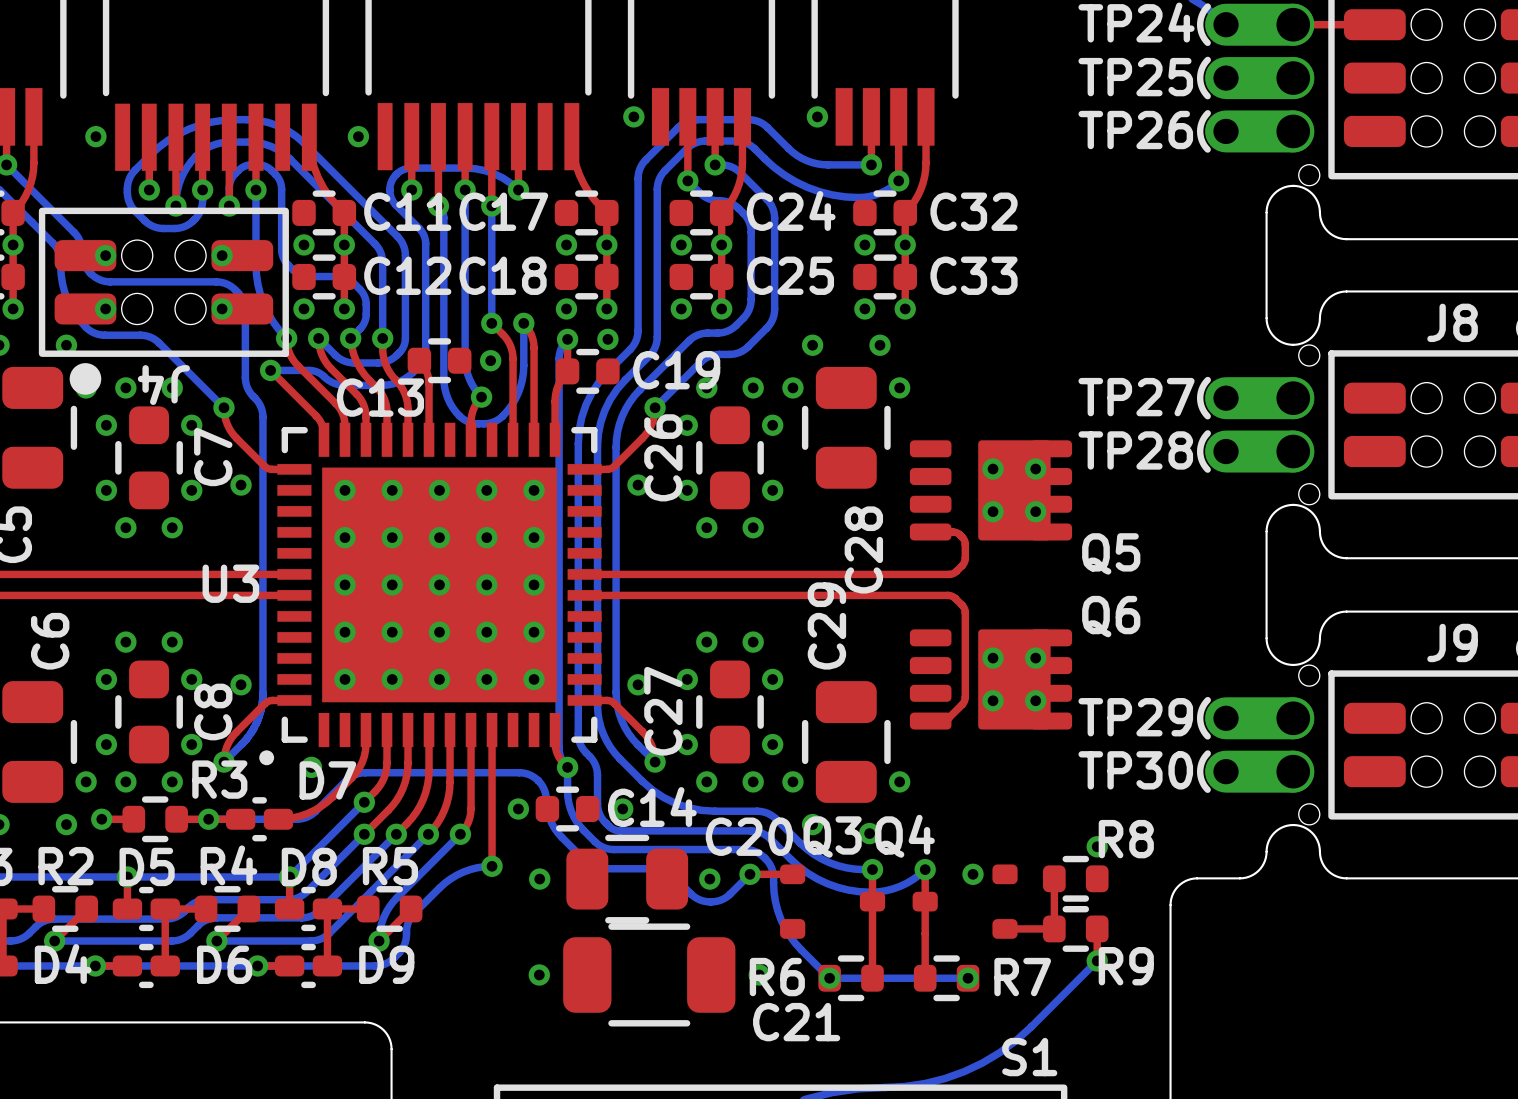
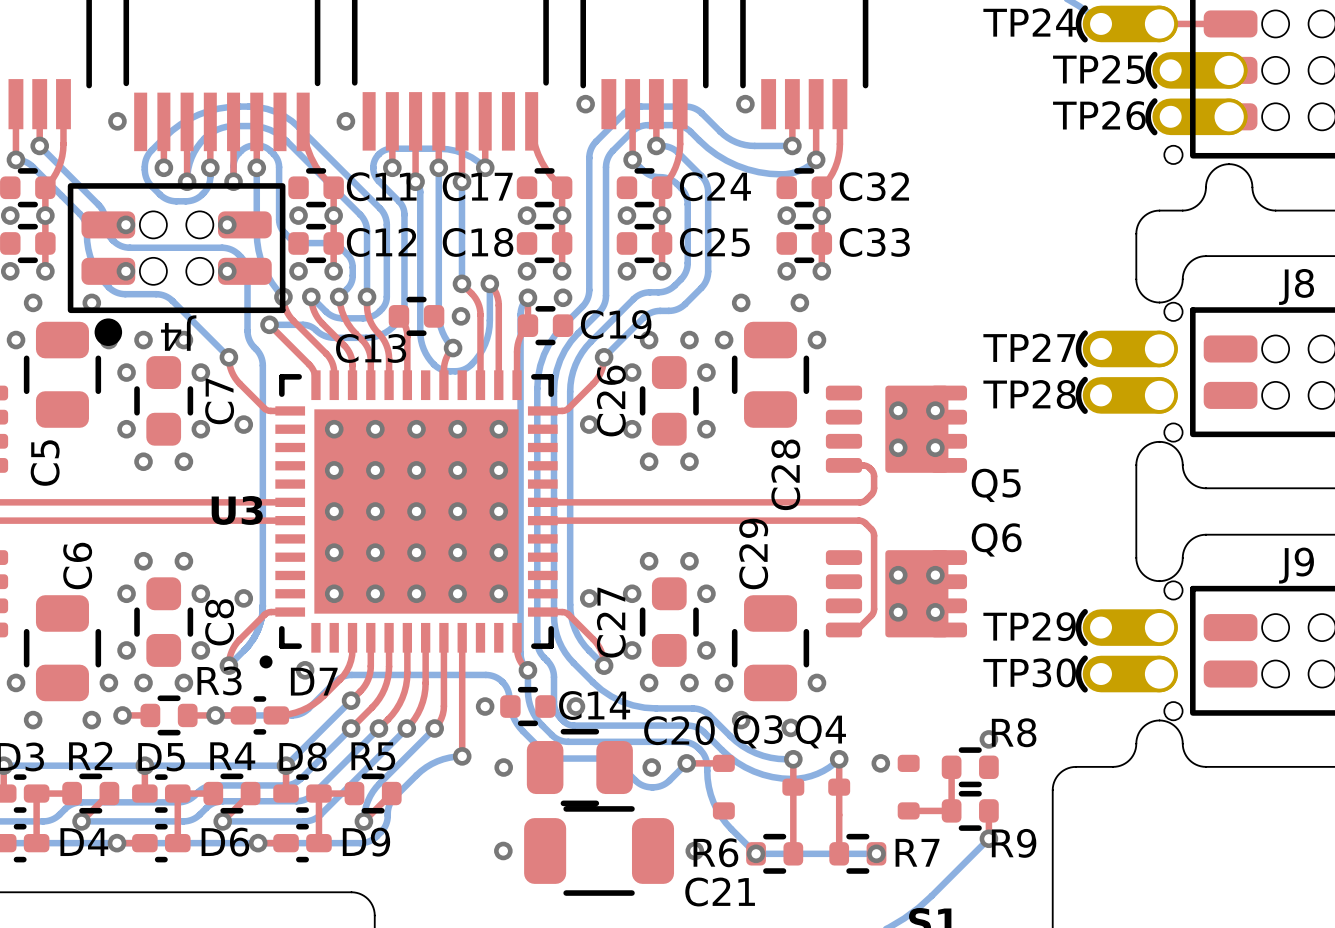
TP25 position: (1255, 78) -> (1196, 70)
TP26 position: (1255, 131) -> (1196, 116)
board edge: (1319, 212) (1325, 229) (1340, 238) (1426, 239) -> (1136, 233) (1139, 221) (1149, 212) (1156, 210) (1185, 210) (1197, 205) (1203, 197) (1207, 179) (1211, 172) (1219, 166) (1226, 164) (1236, 165) (1245, 170) (1251, 179) (1252, 192) (1257, 201) (1265, 208) (1275, 210)
board edge: (1319, 212) (1315, 198) (1304, 188) (1287, 186) (1274, 193) (1266, 209) (1266, 265) -> none

